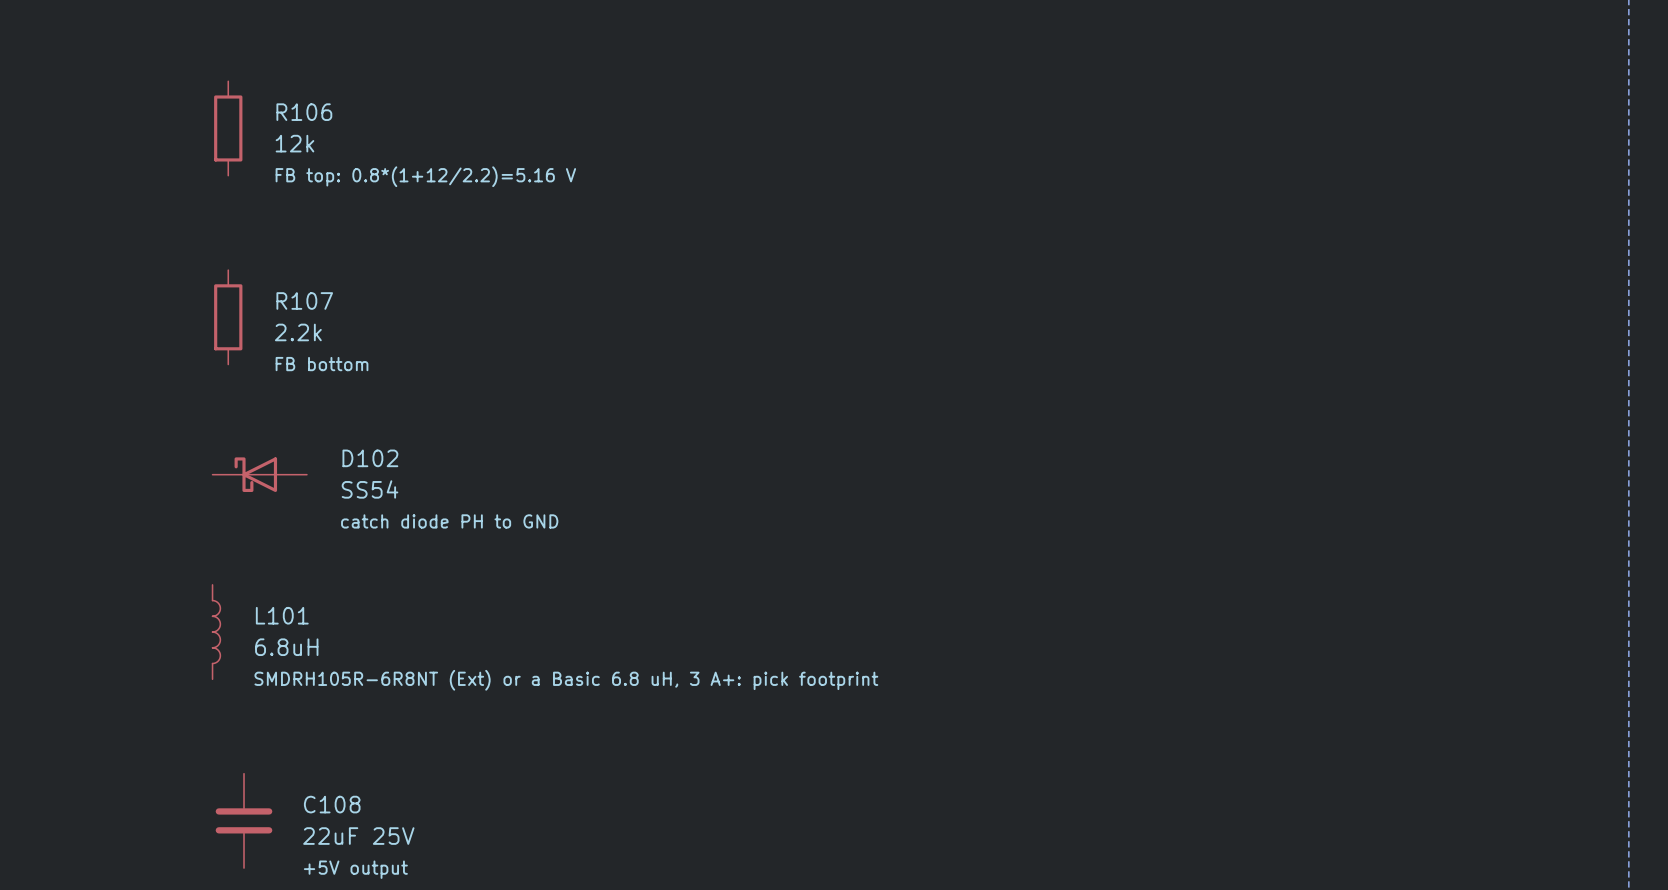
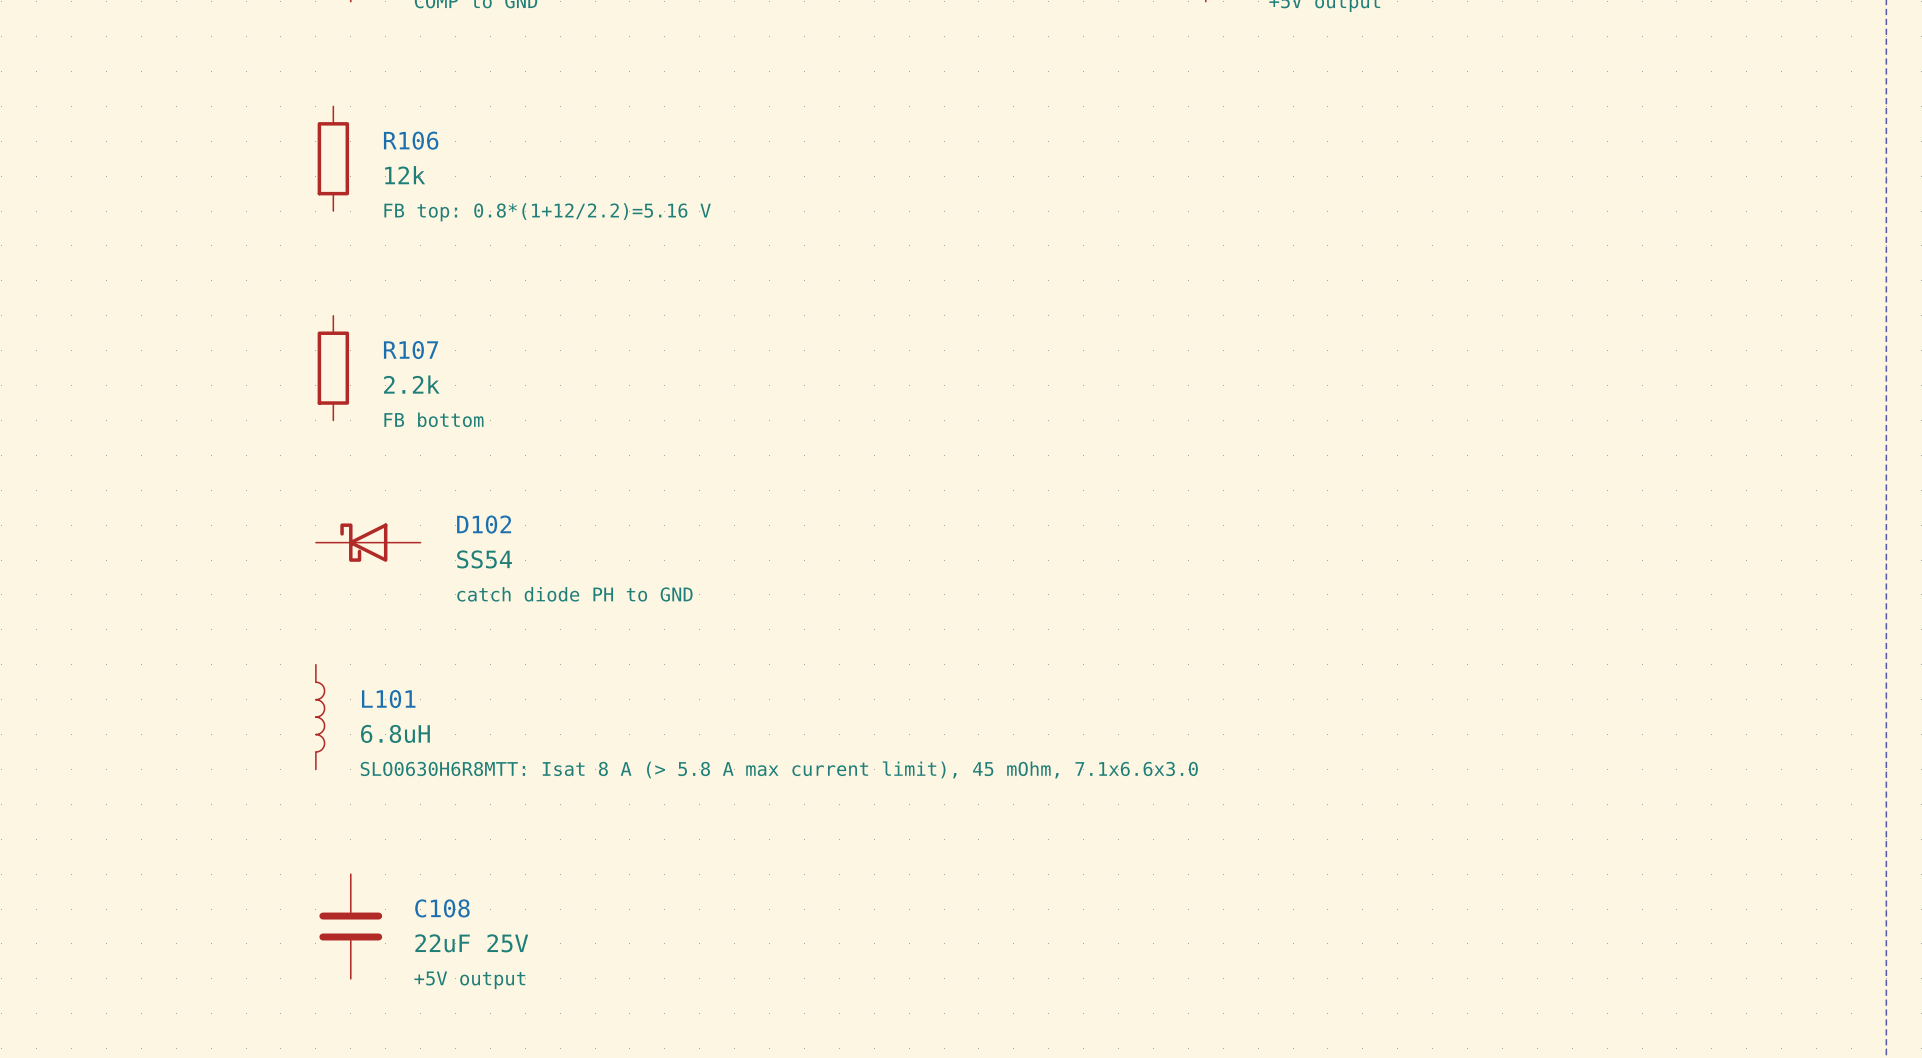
L101 text: SMDRH105R-6R8NT (Ext) or a Basic 6.8 uH, 3 A+: pick footprint (566, 680) -> SLO0630H6R8MTT: Isat 8 A (> 5.8 A max current limit), 45 mOhm, 7.1x6.6x3.0 (779, 769)

